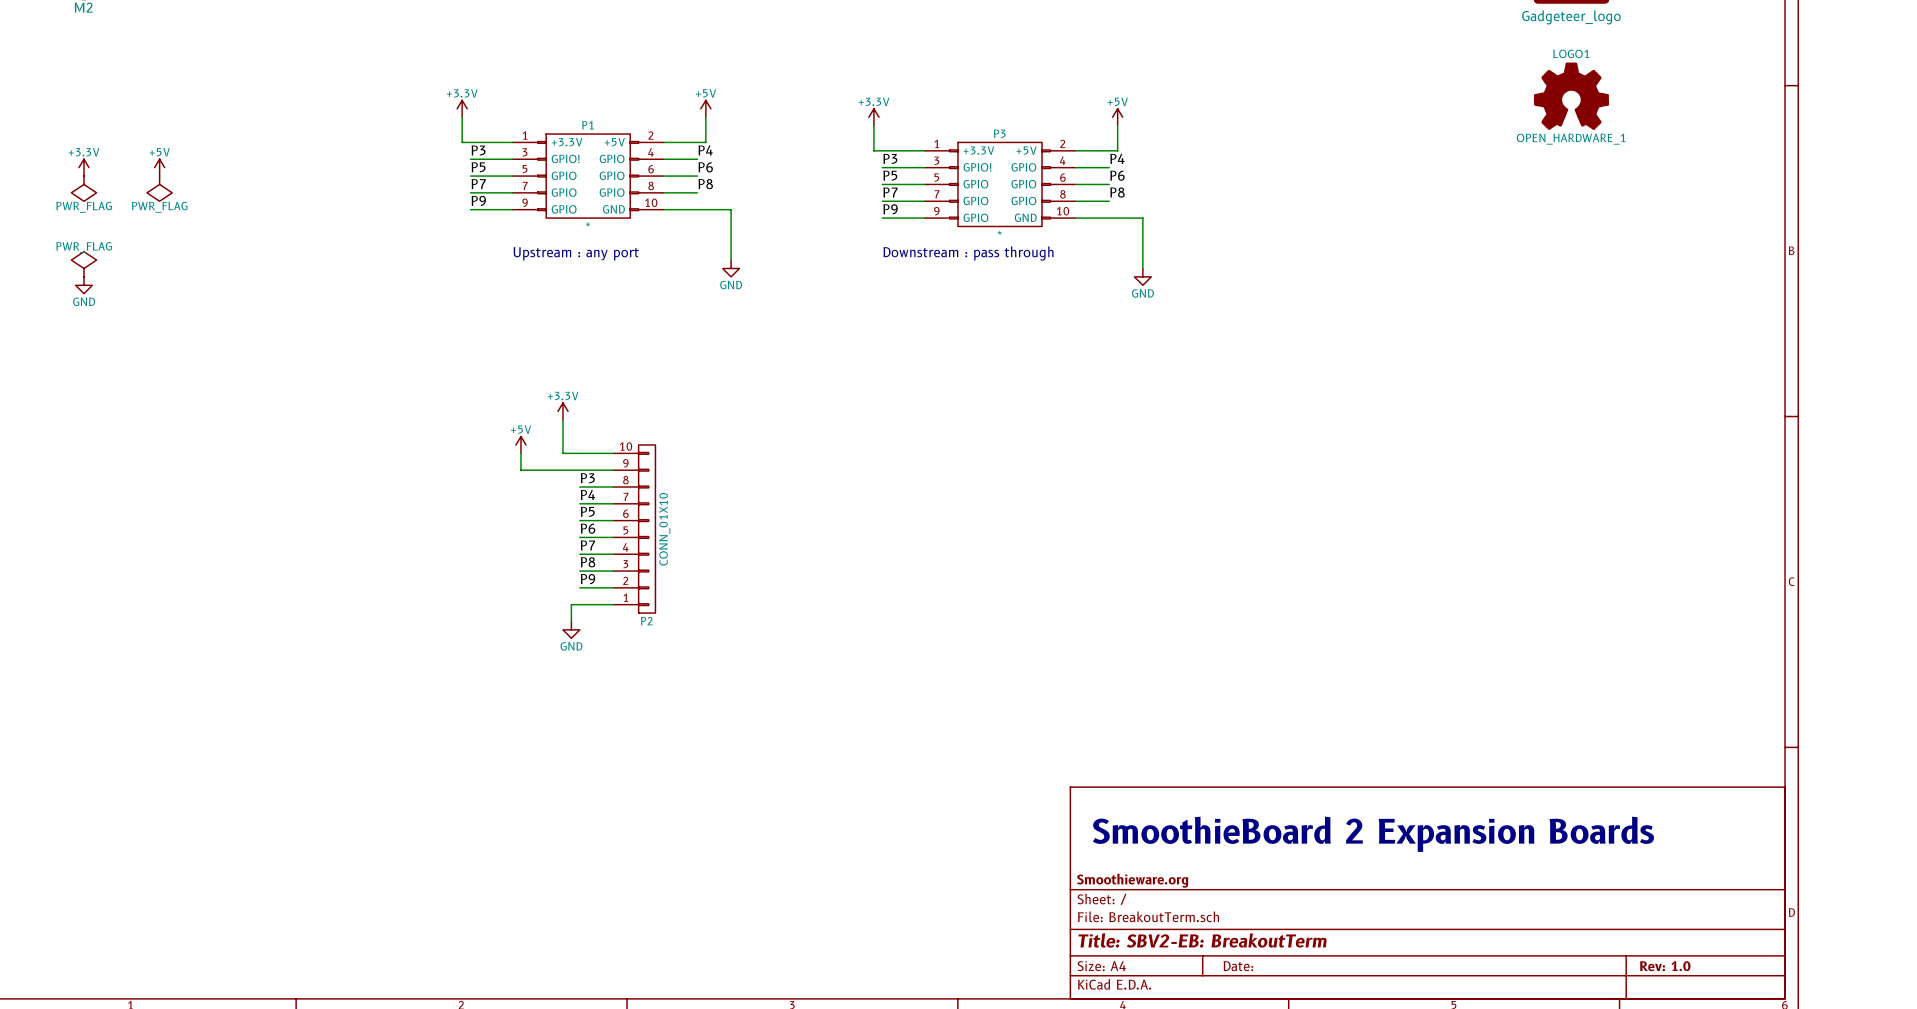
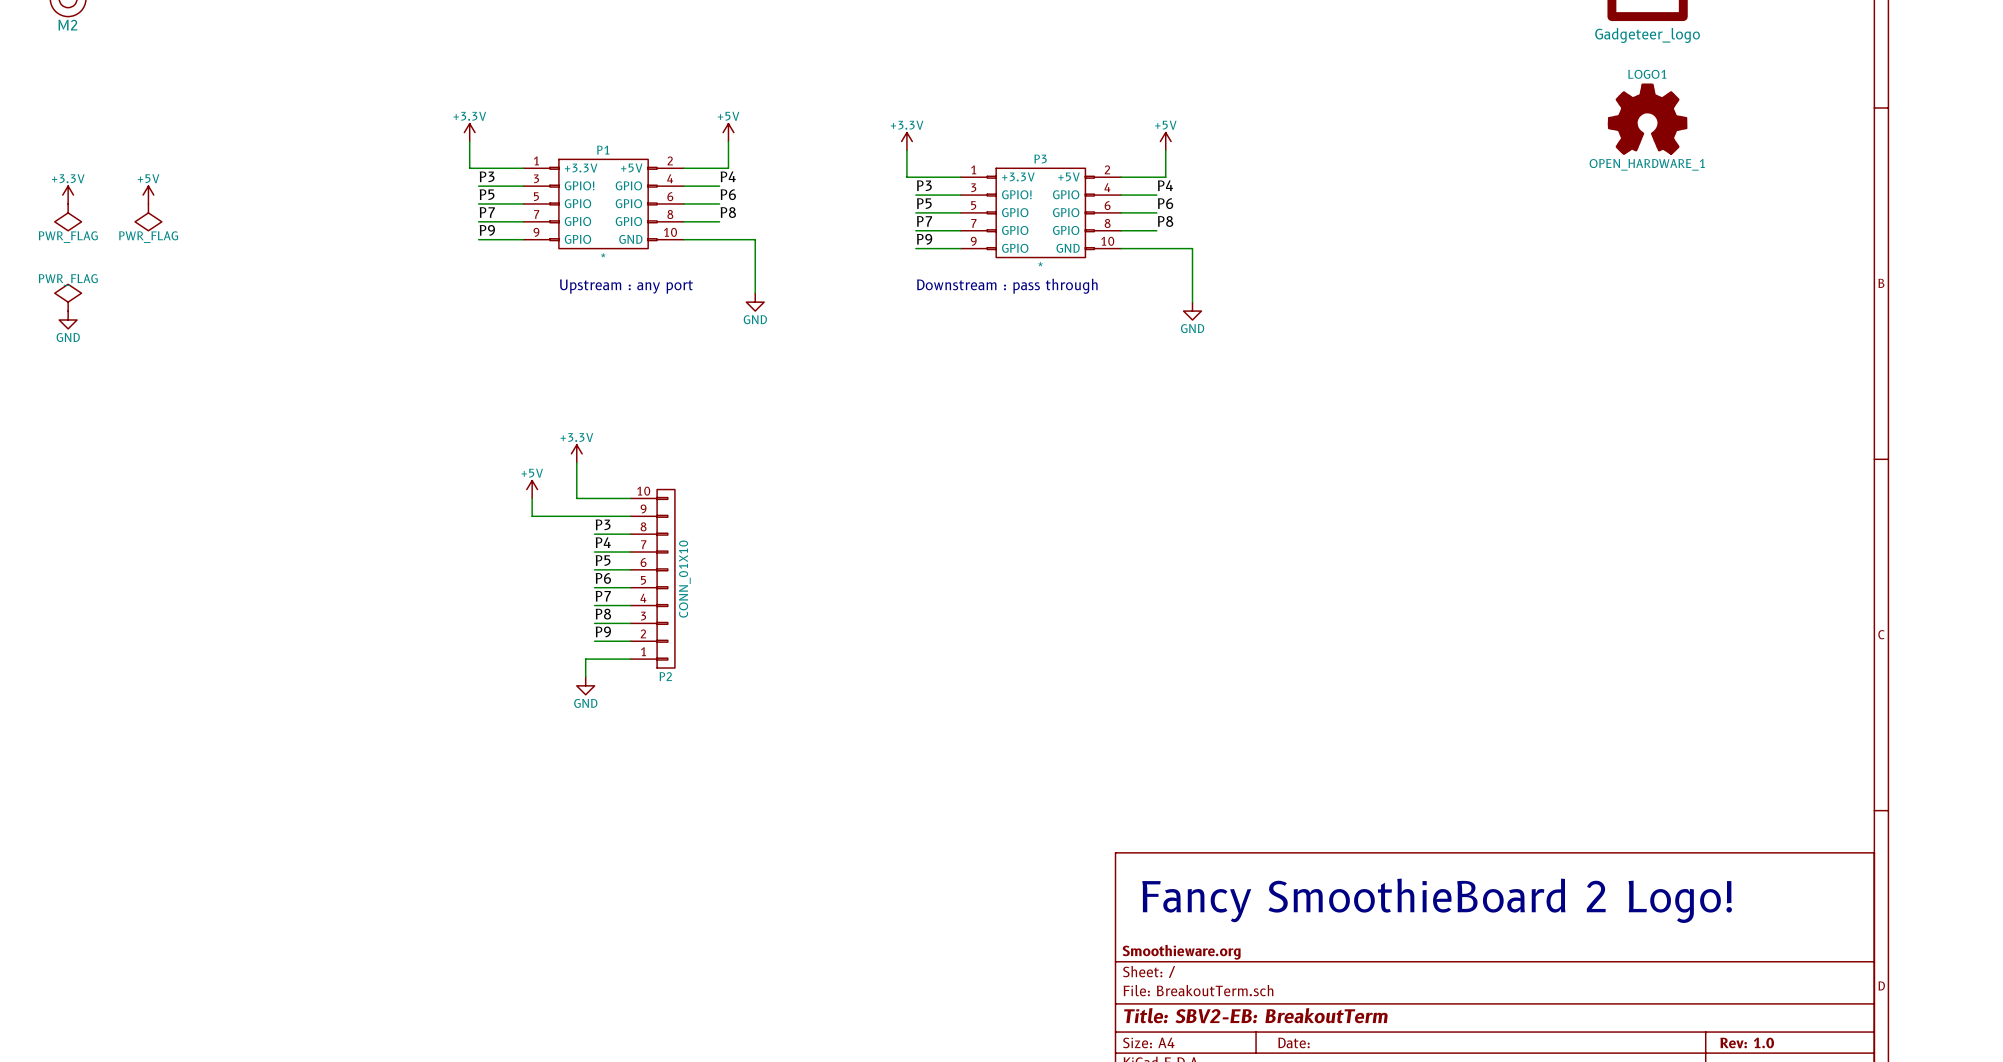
text position: Upstream : any port (576, 253) -> Upstream : any port (626, 286)
text: SmoothieBoard 2 Expansion Boards (1373, 834) -> Fancy SmoothieBoard 2 Logo! (1437, 900)

